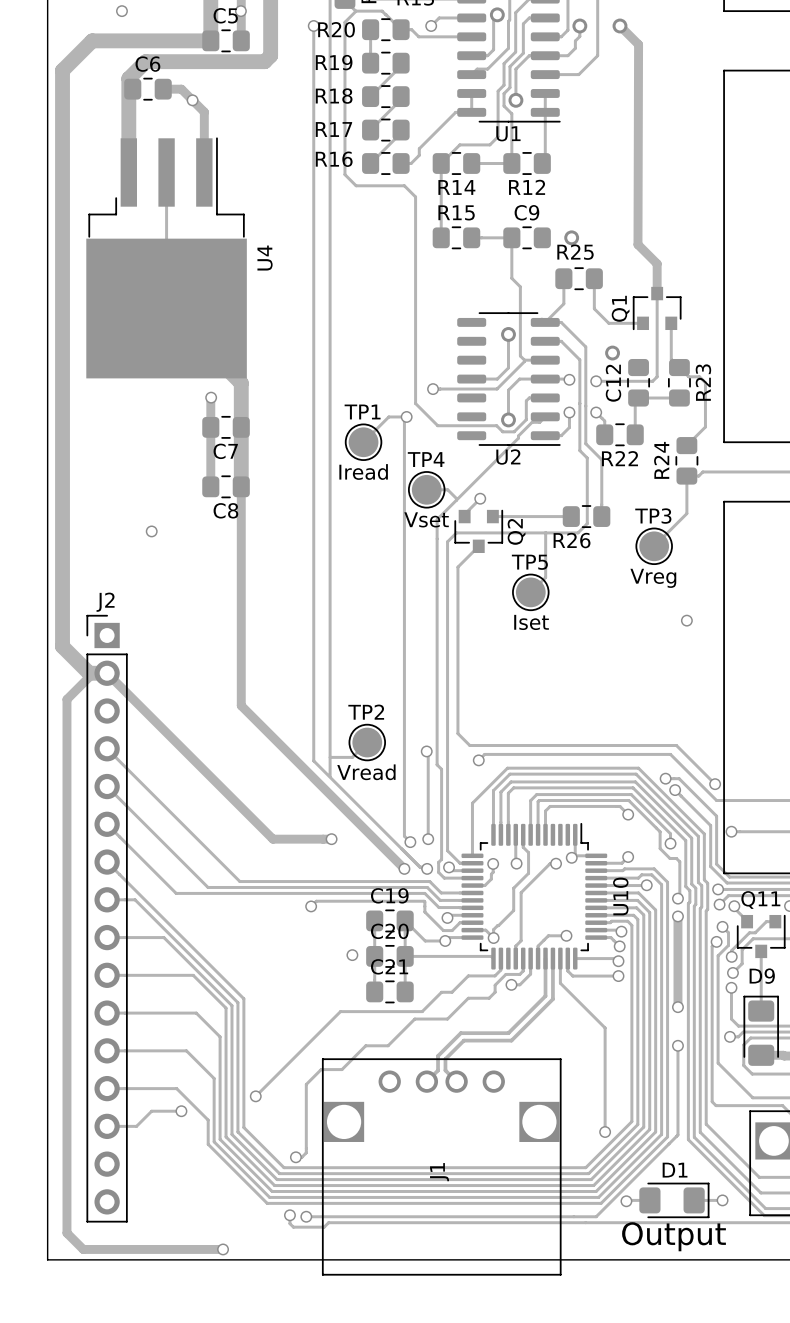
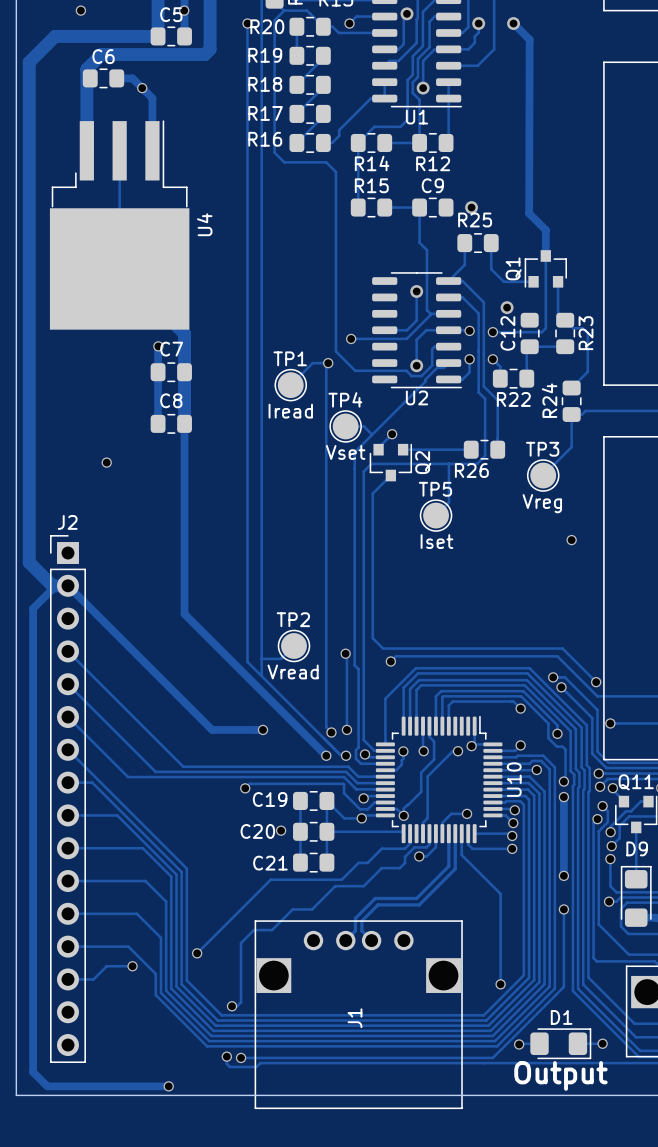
C7 name position: C7 (225, 451) -> C7 (171, 349)
C8 name position: C8 (225, 510) -> C8 (171, 400)
C19 name position: C19 (389, 895) -> C19 (270, 799)
C20 name position: C20 (389, 931) -> C20 (257, 831)
C21 name position: C21 (389, 966) -> C21 (270, 863)

